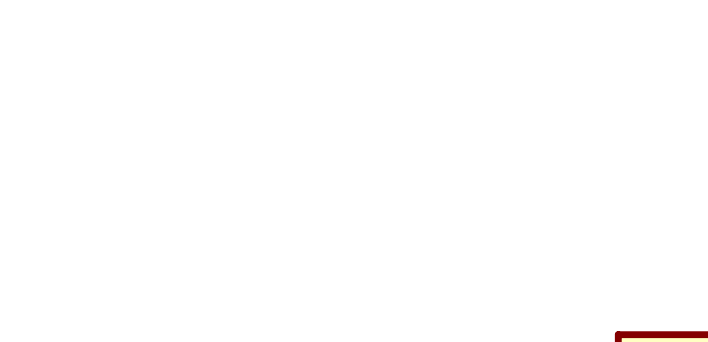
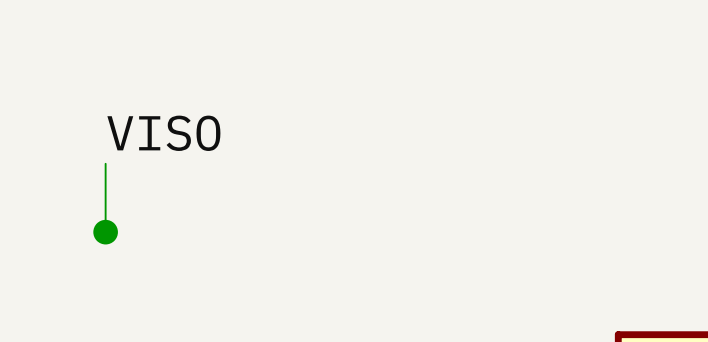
label: none -> VISO (163, 133)
wire: none -> (105, 163) (105, 232)
junction: none -> (105, 232)

